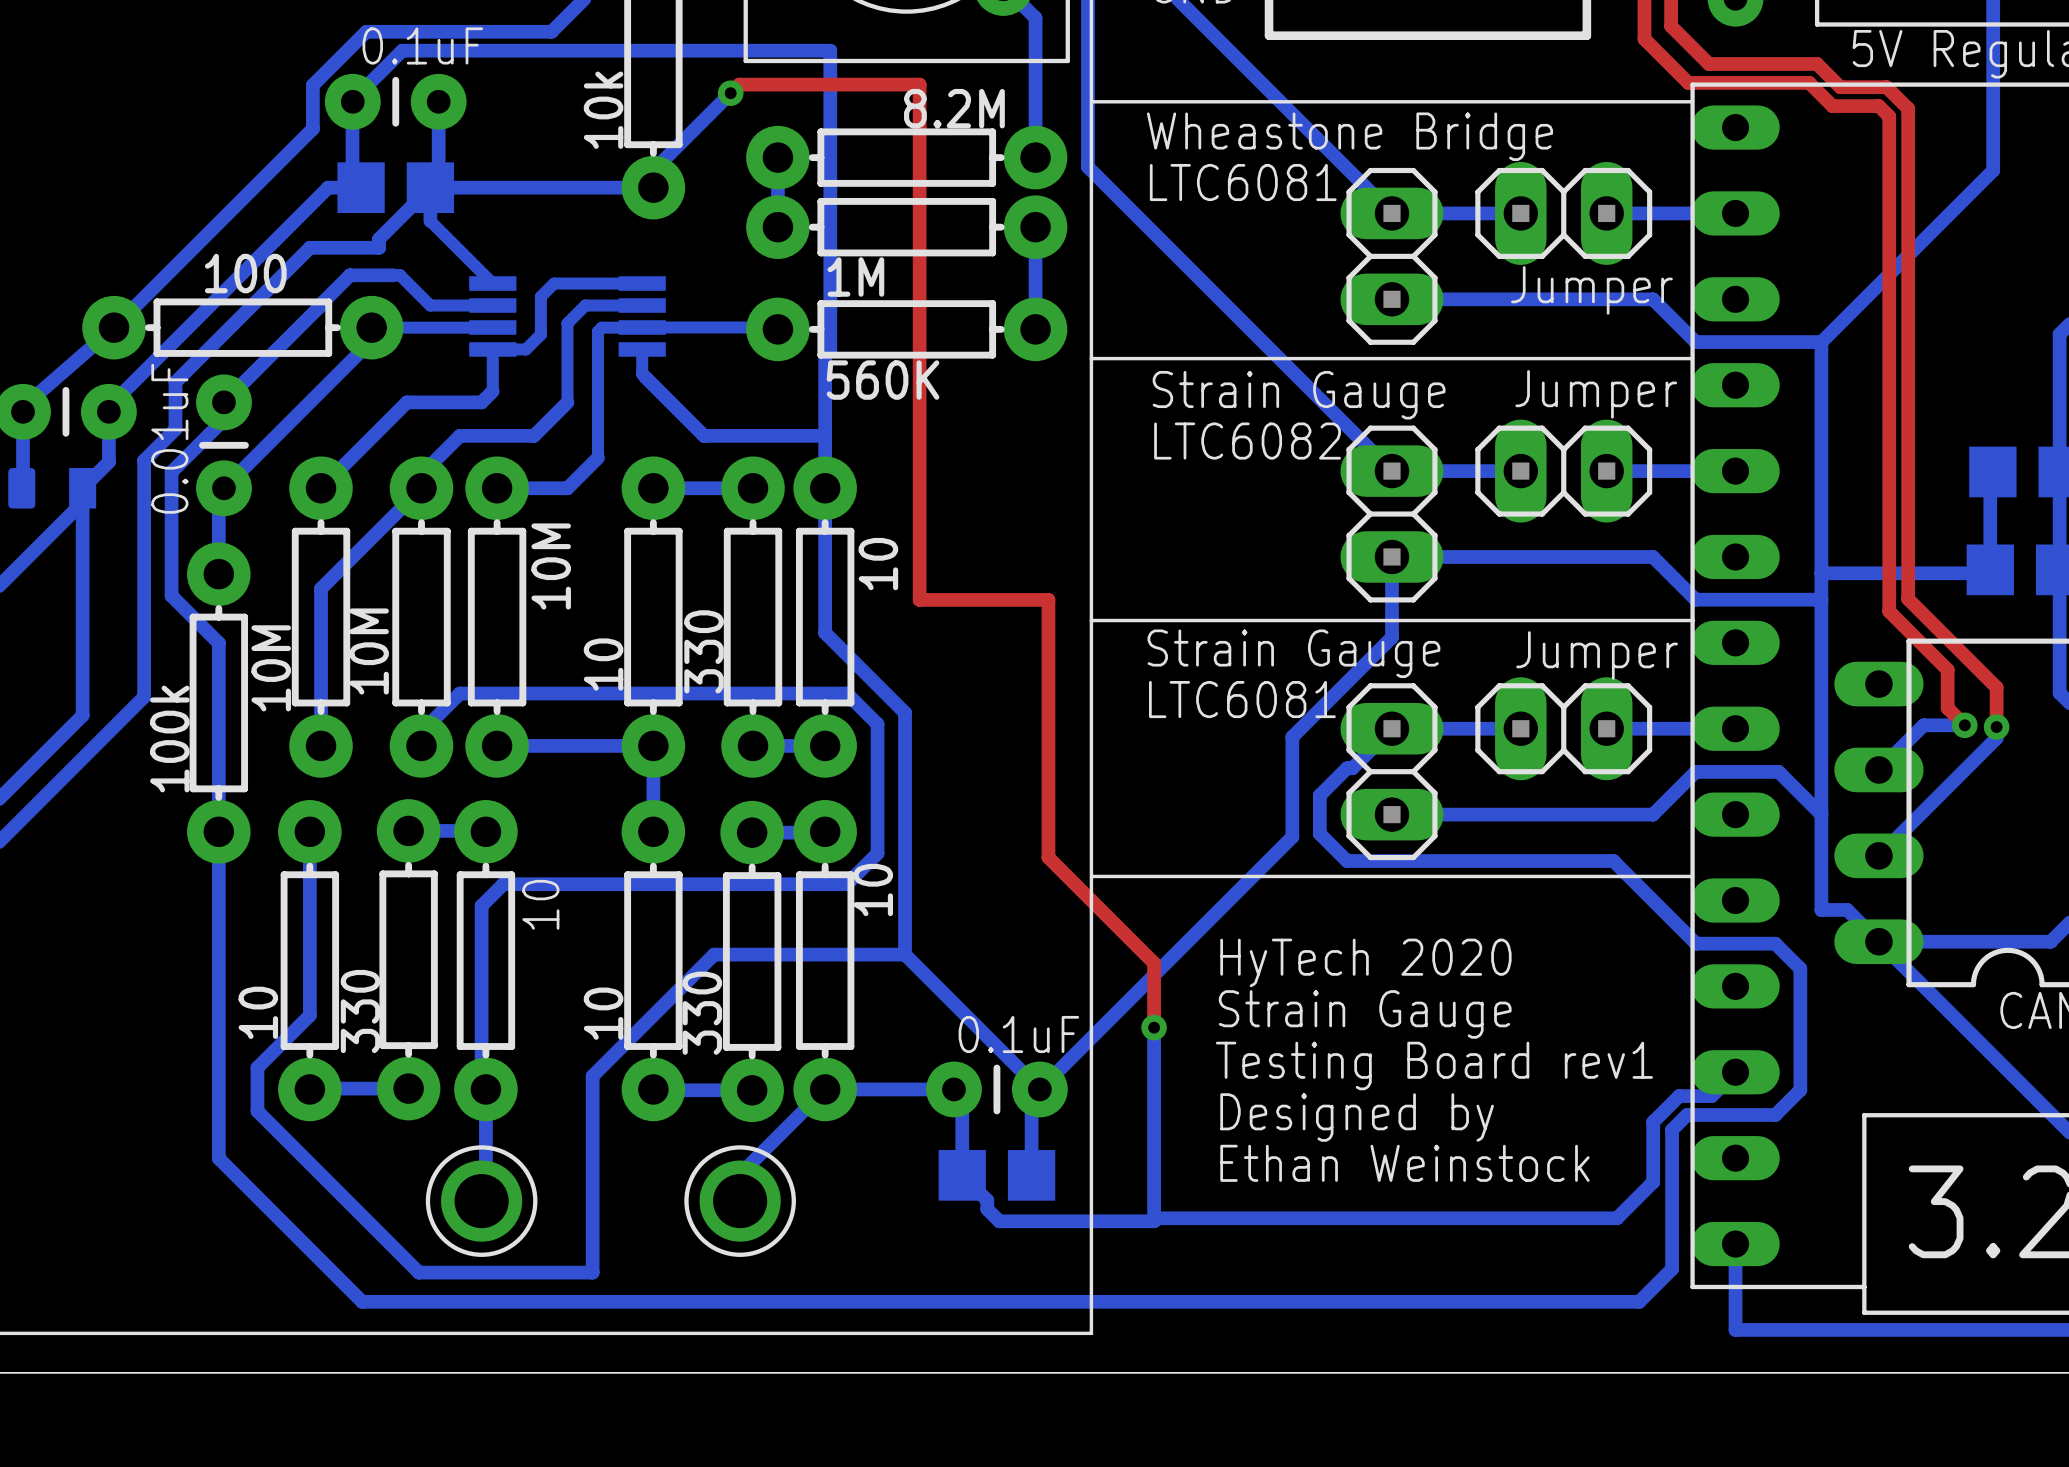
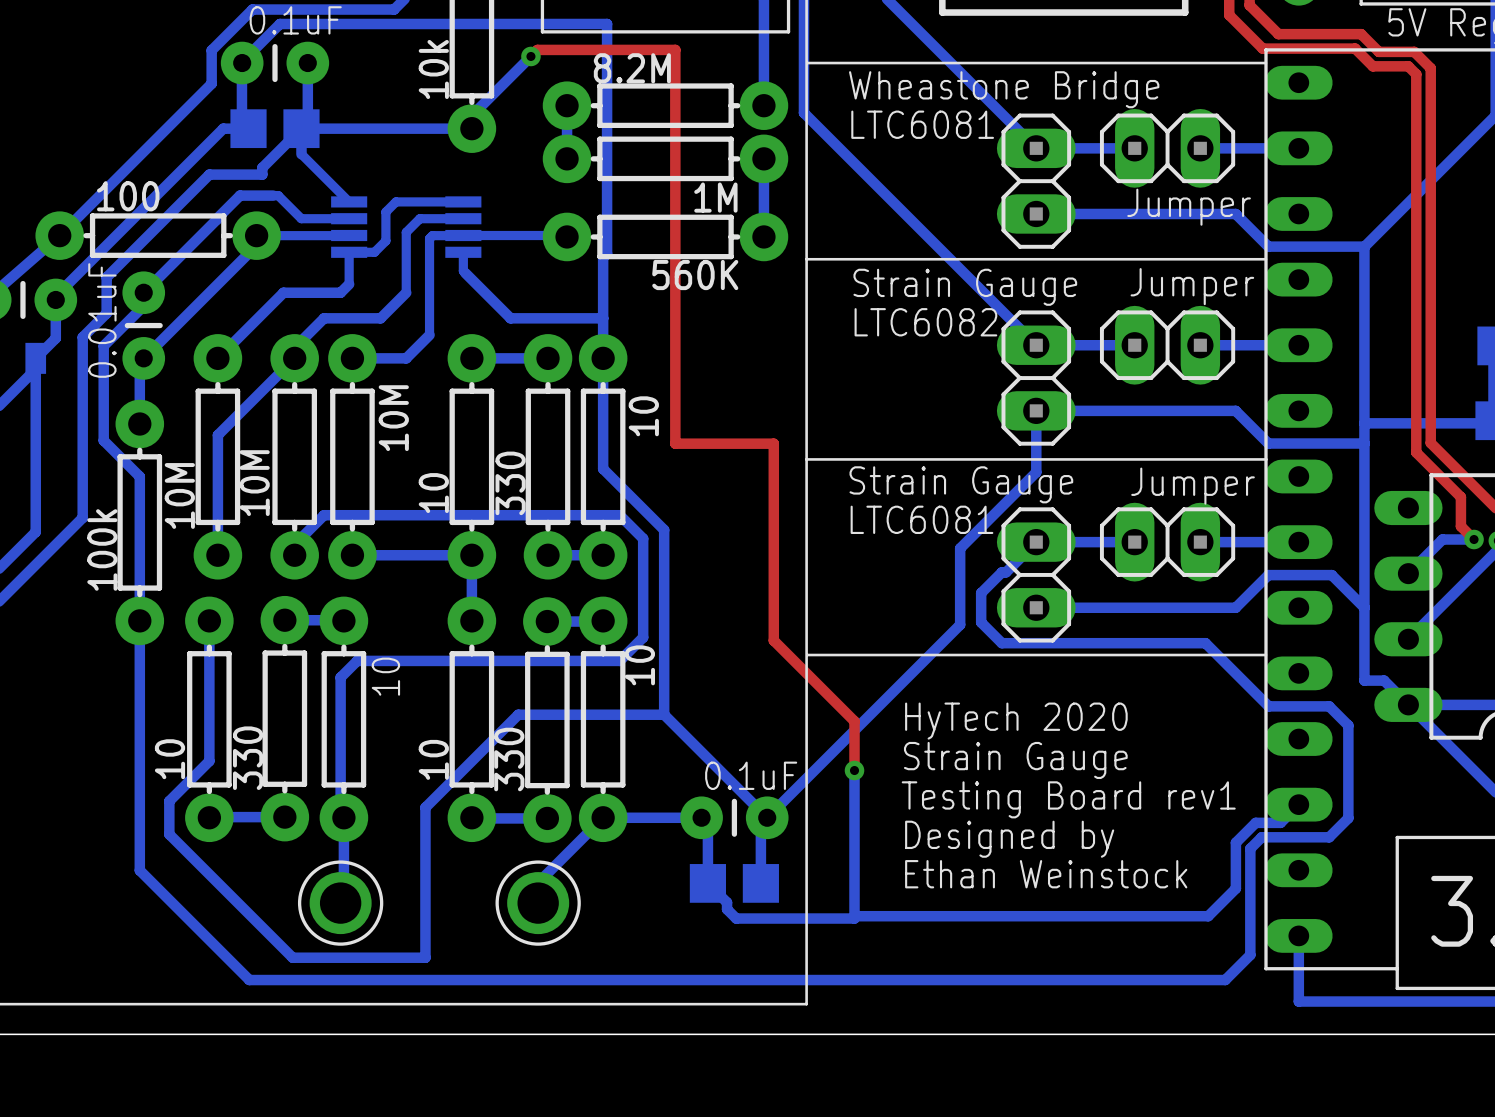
part value position: 8.2M (954, 108) -> 8.2M (632, 68)
part value position: 100 (245, 273) -> 100 (128, 196)
part value position: 1M (855, 276) -> 1M (715, 197)
part value position: 560K (883, 380) -> 560K (695, 275)

